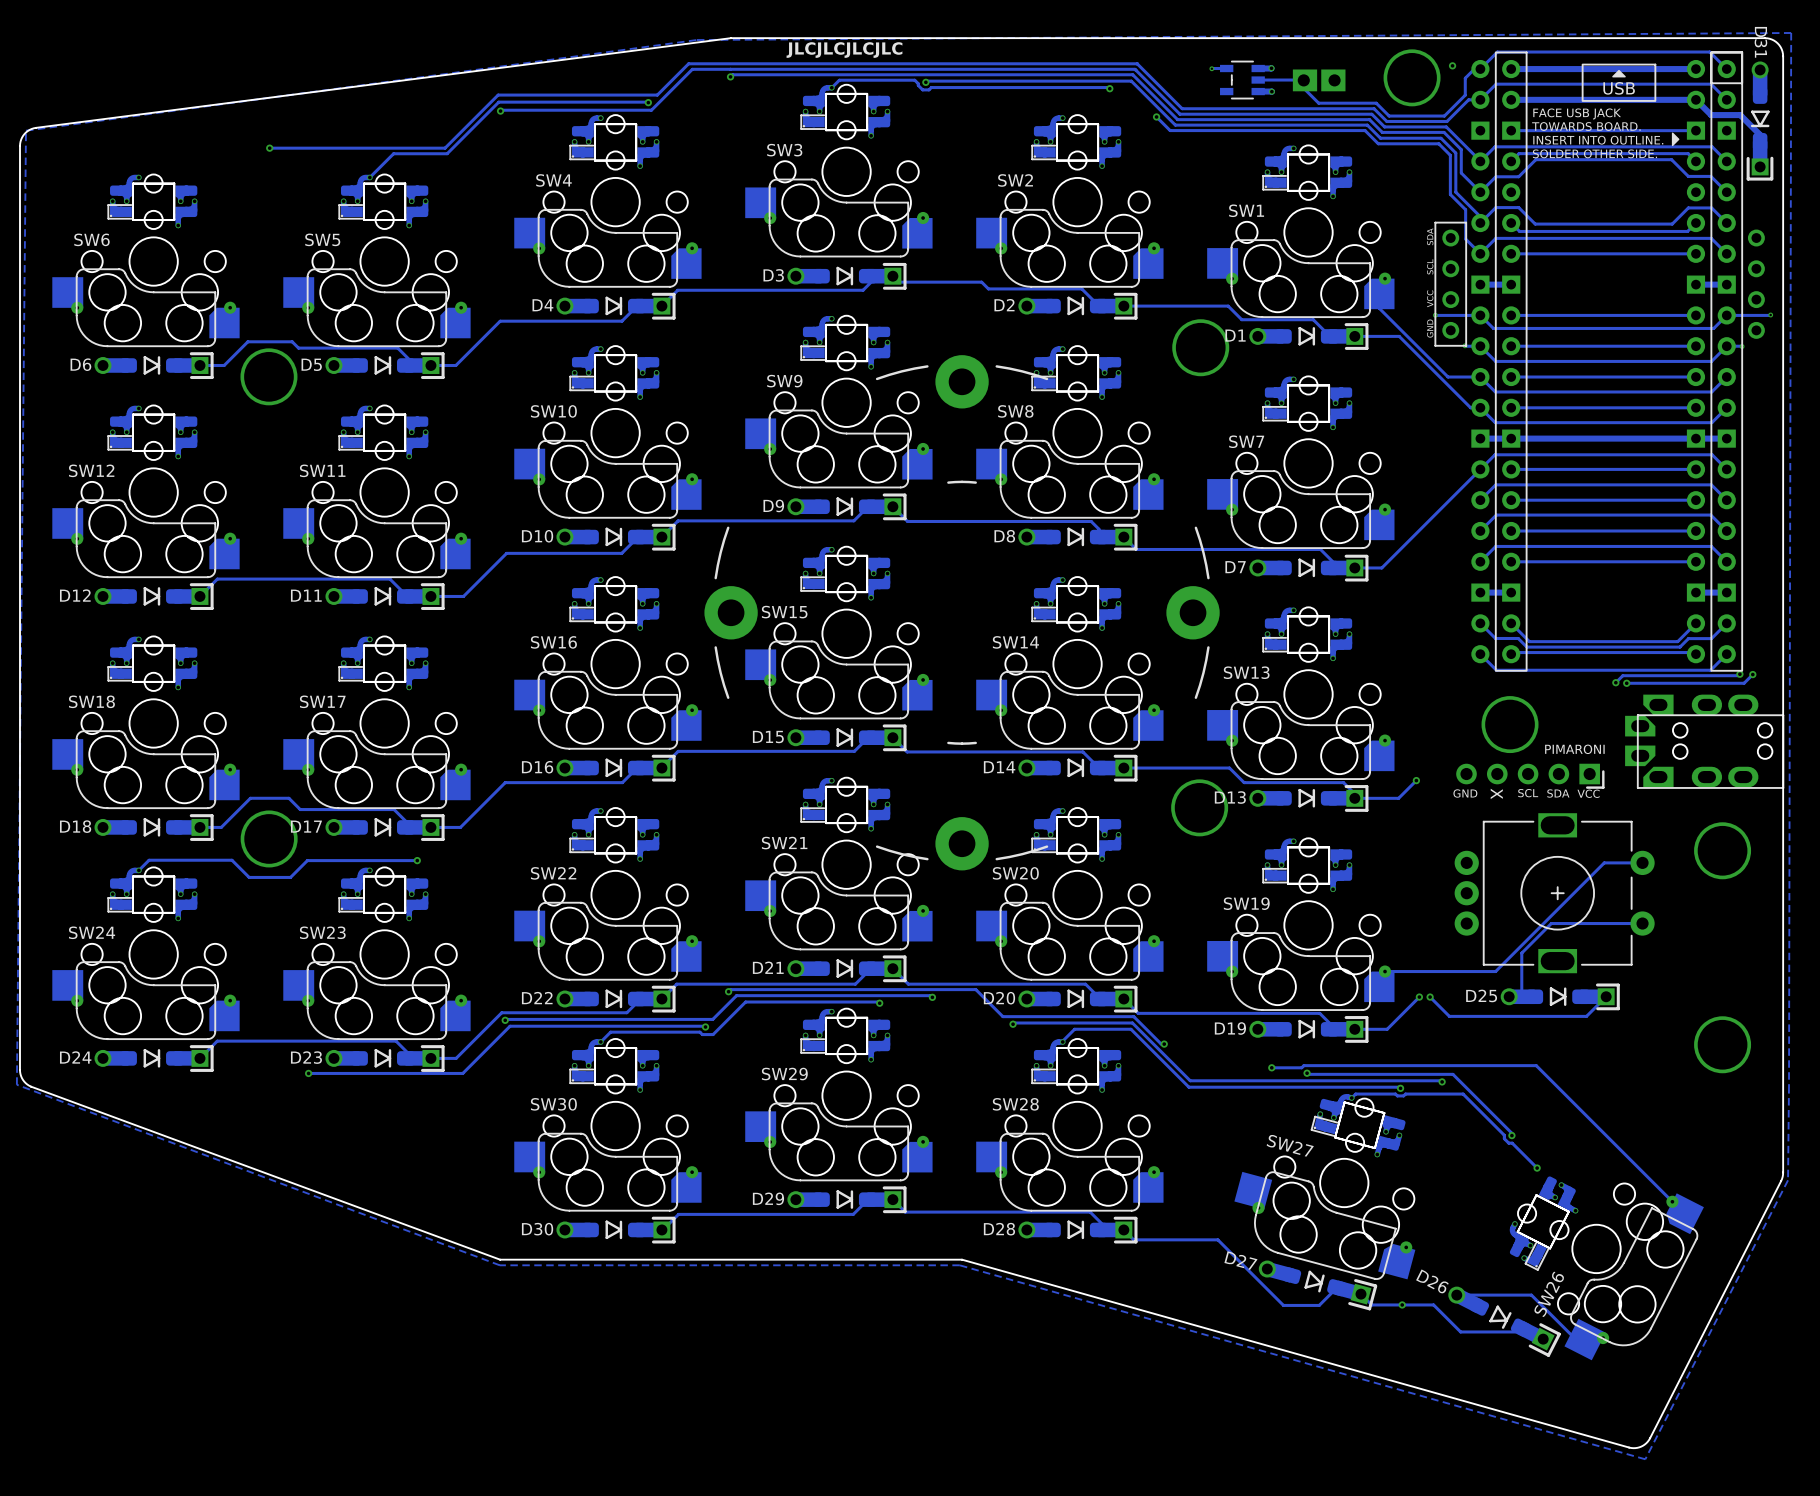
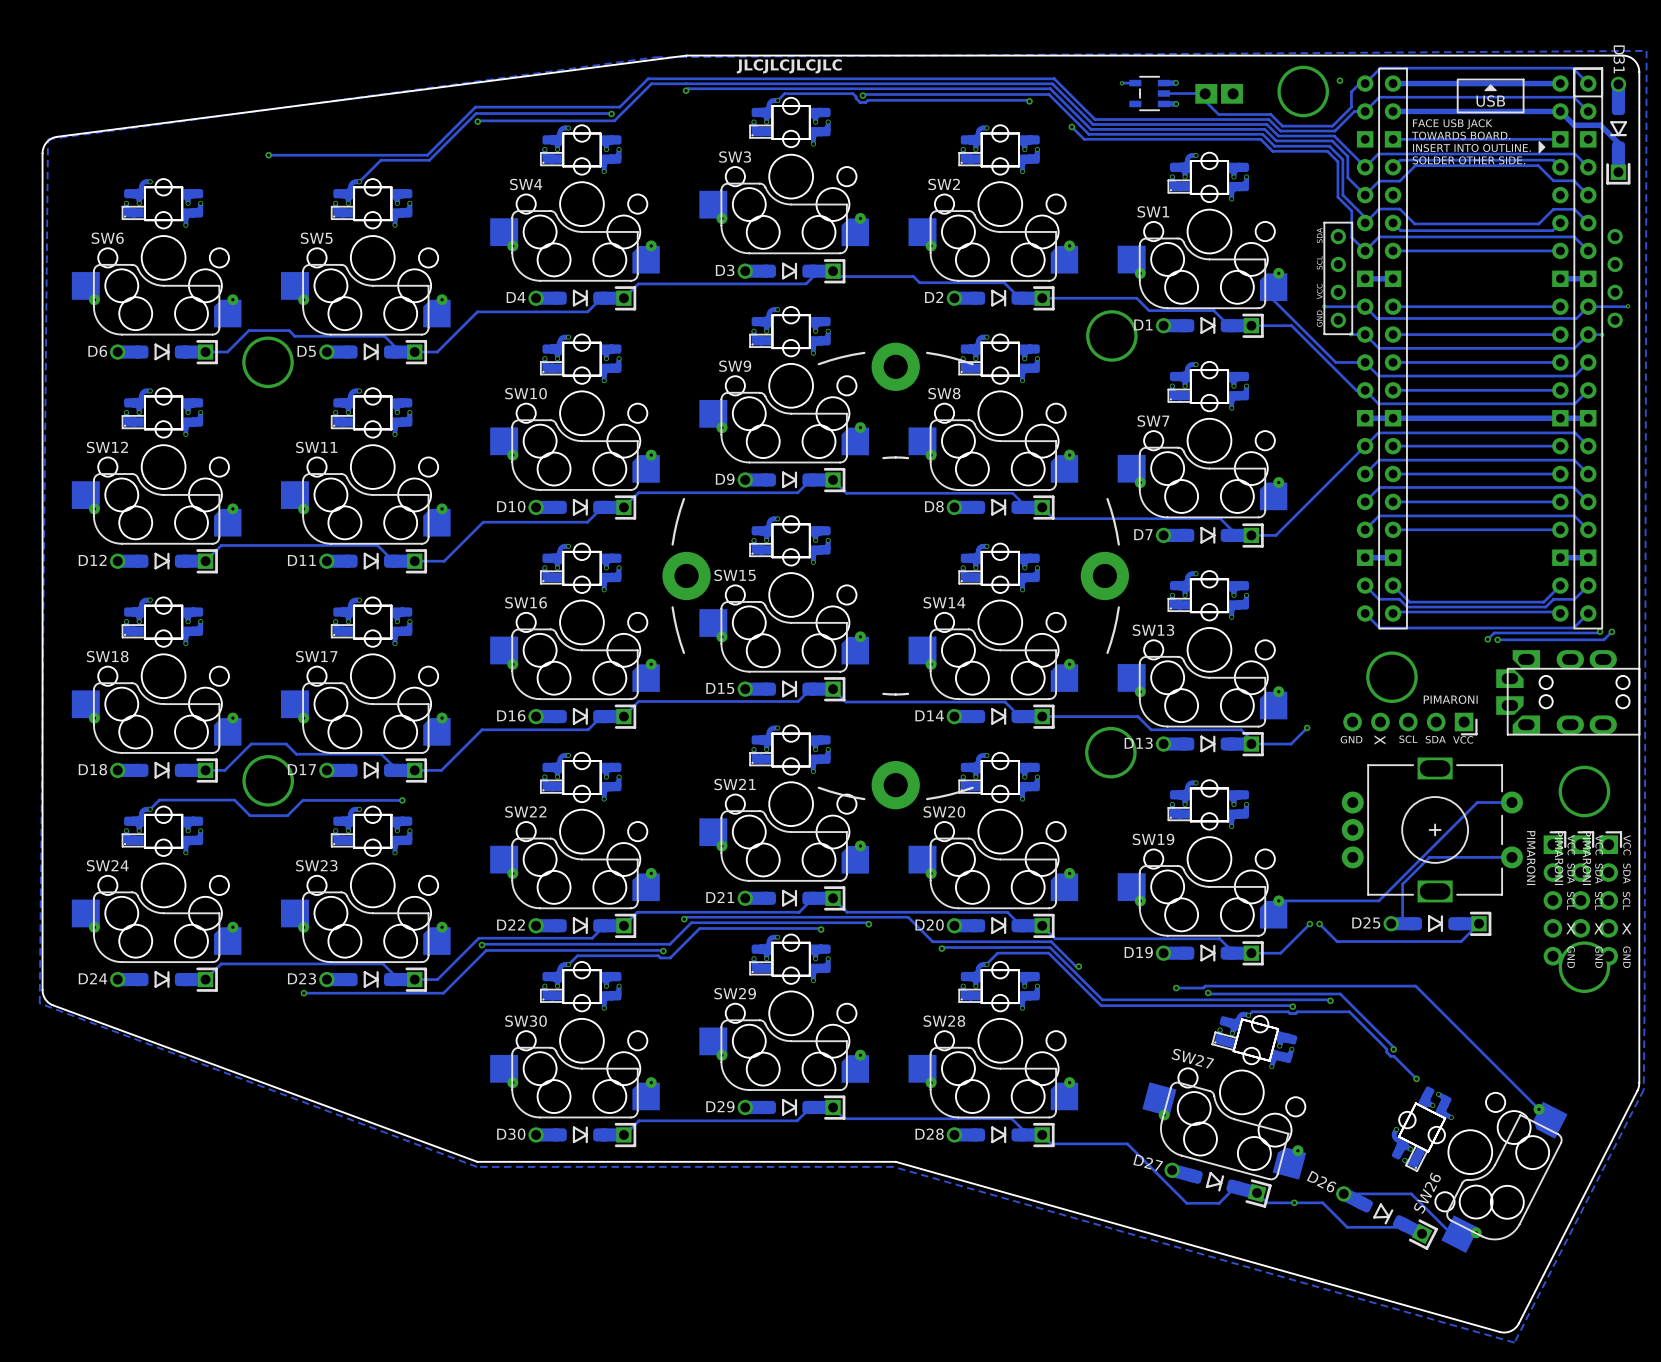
part: none -> (1554, 898)
part: none -> (1582, 898)
part: none -> (1610, 898)

